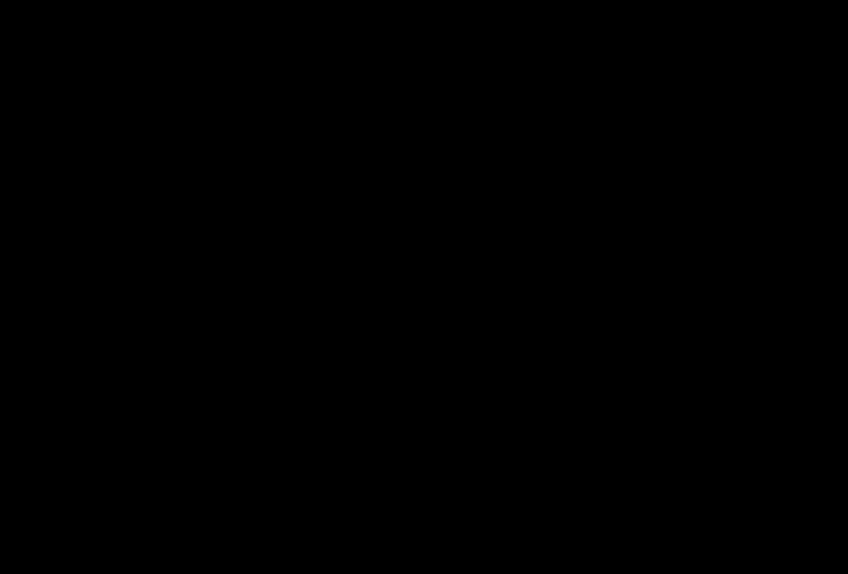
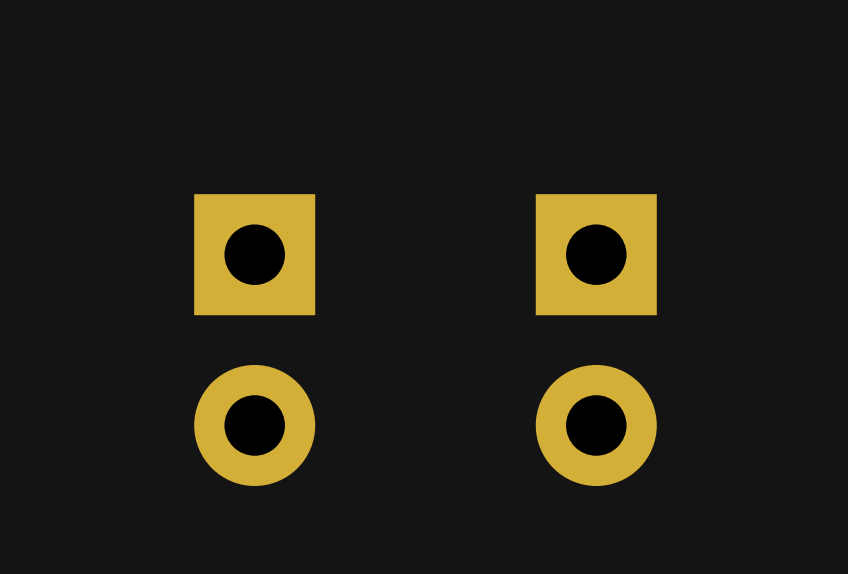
part: none -> (254, 340)
part: none -> (596, 340)

